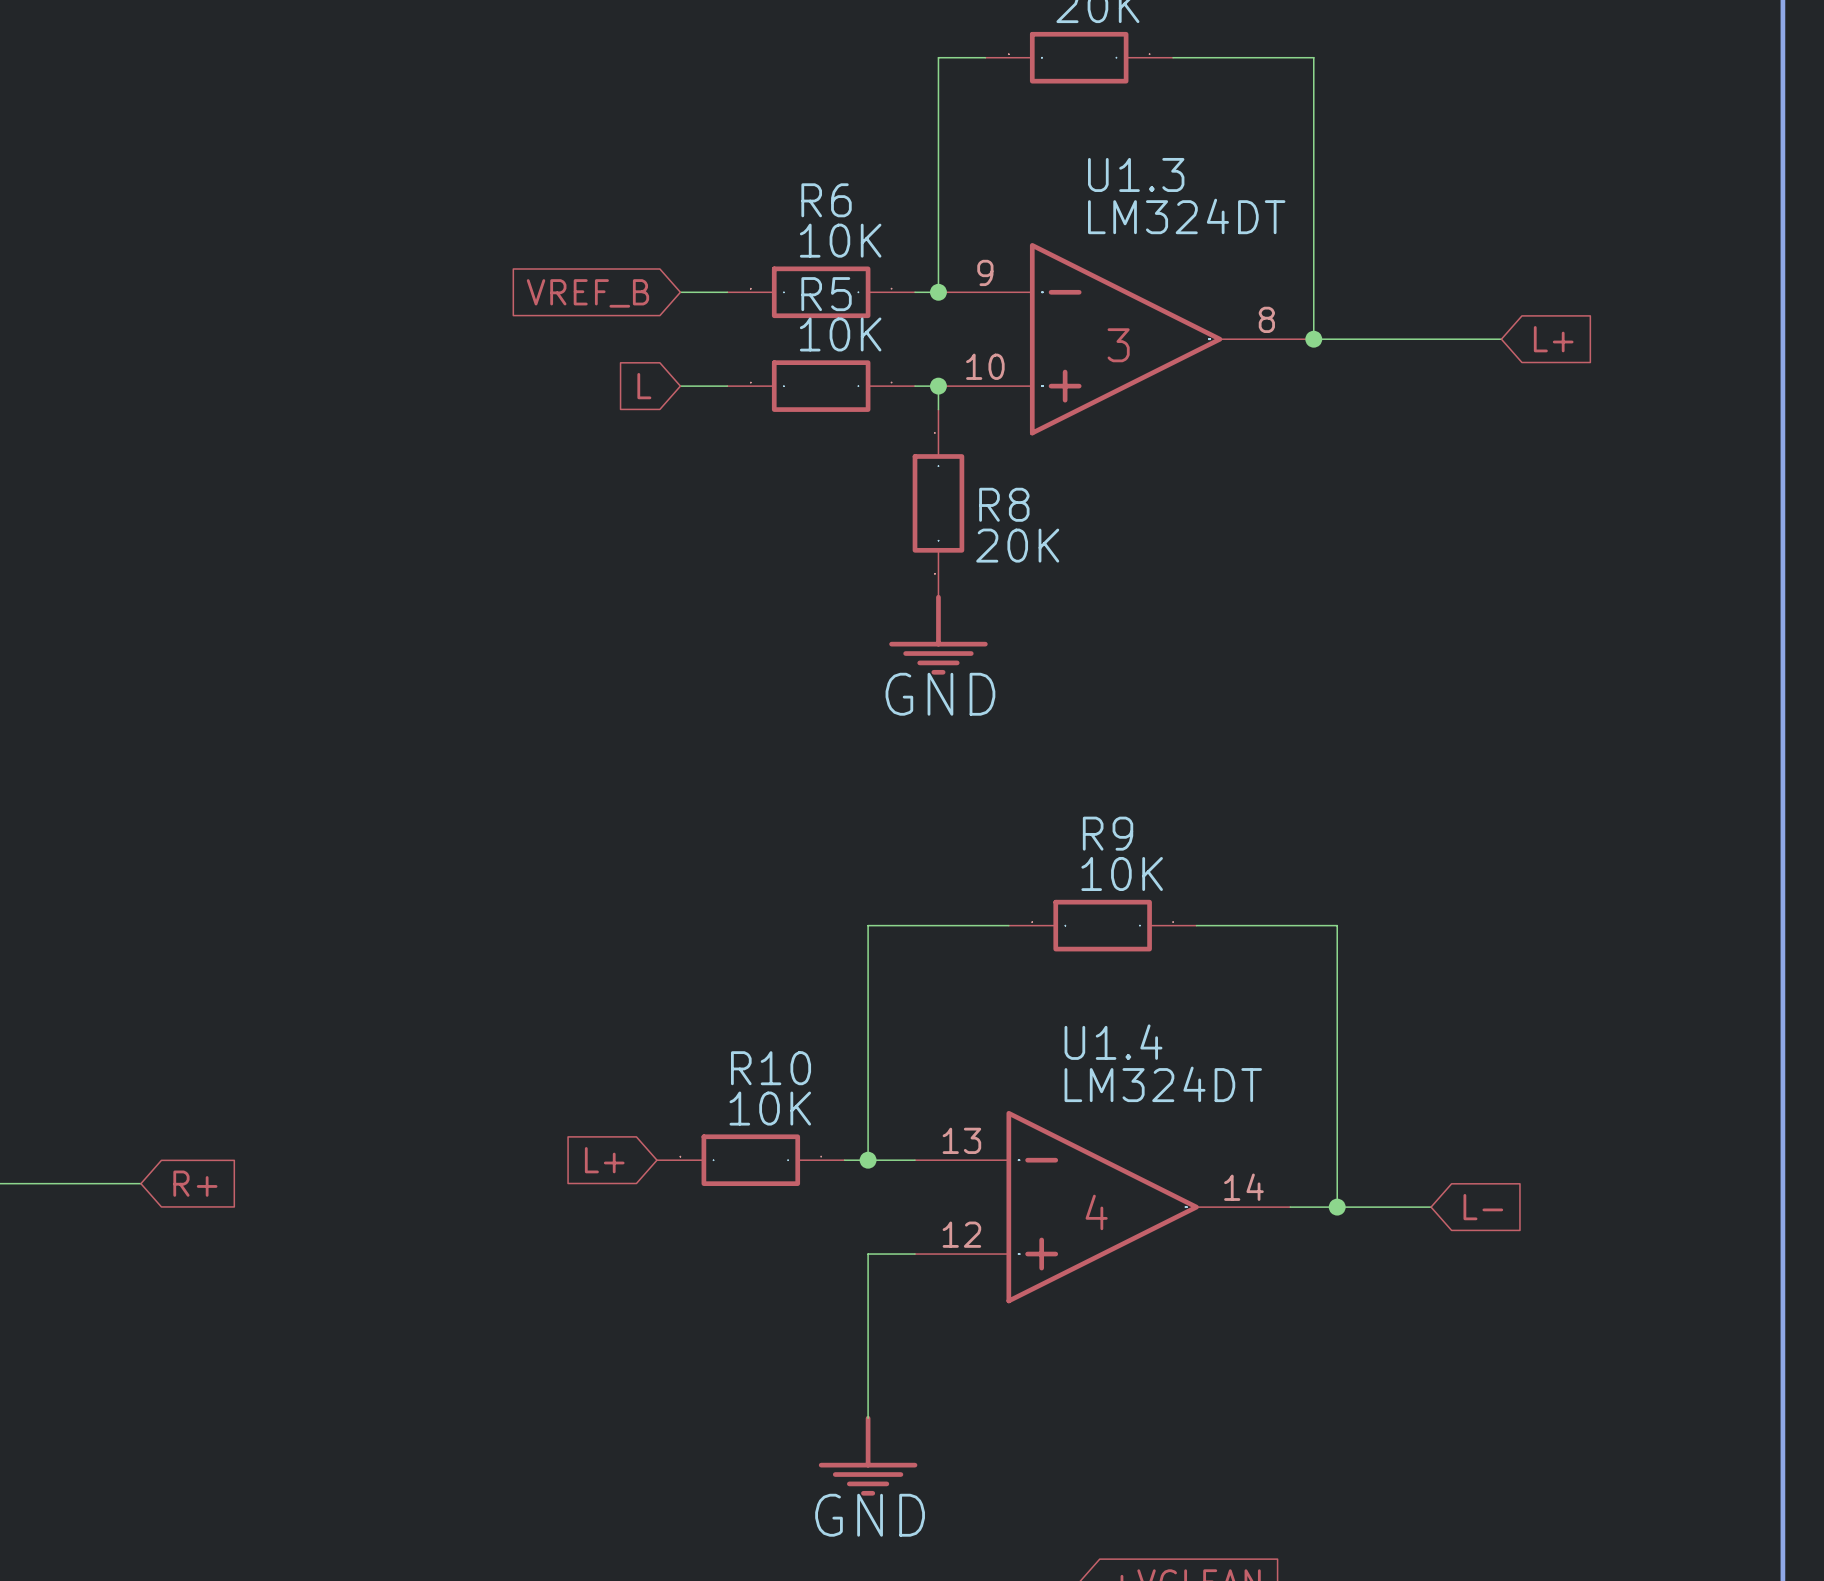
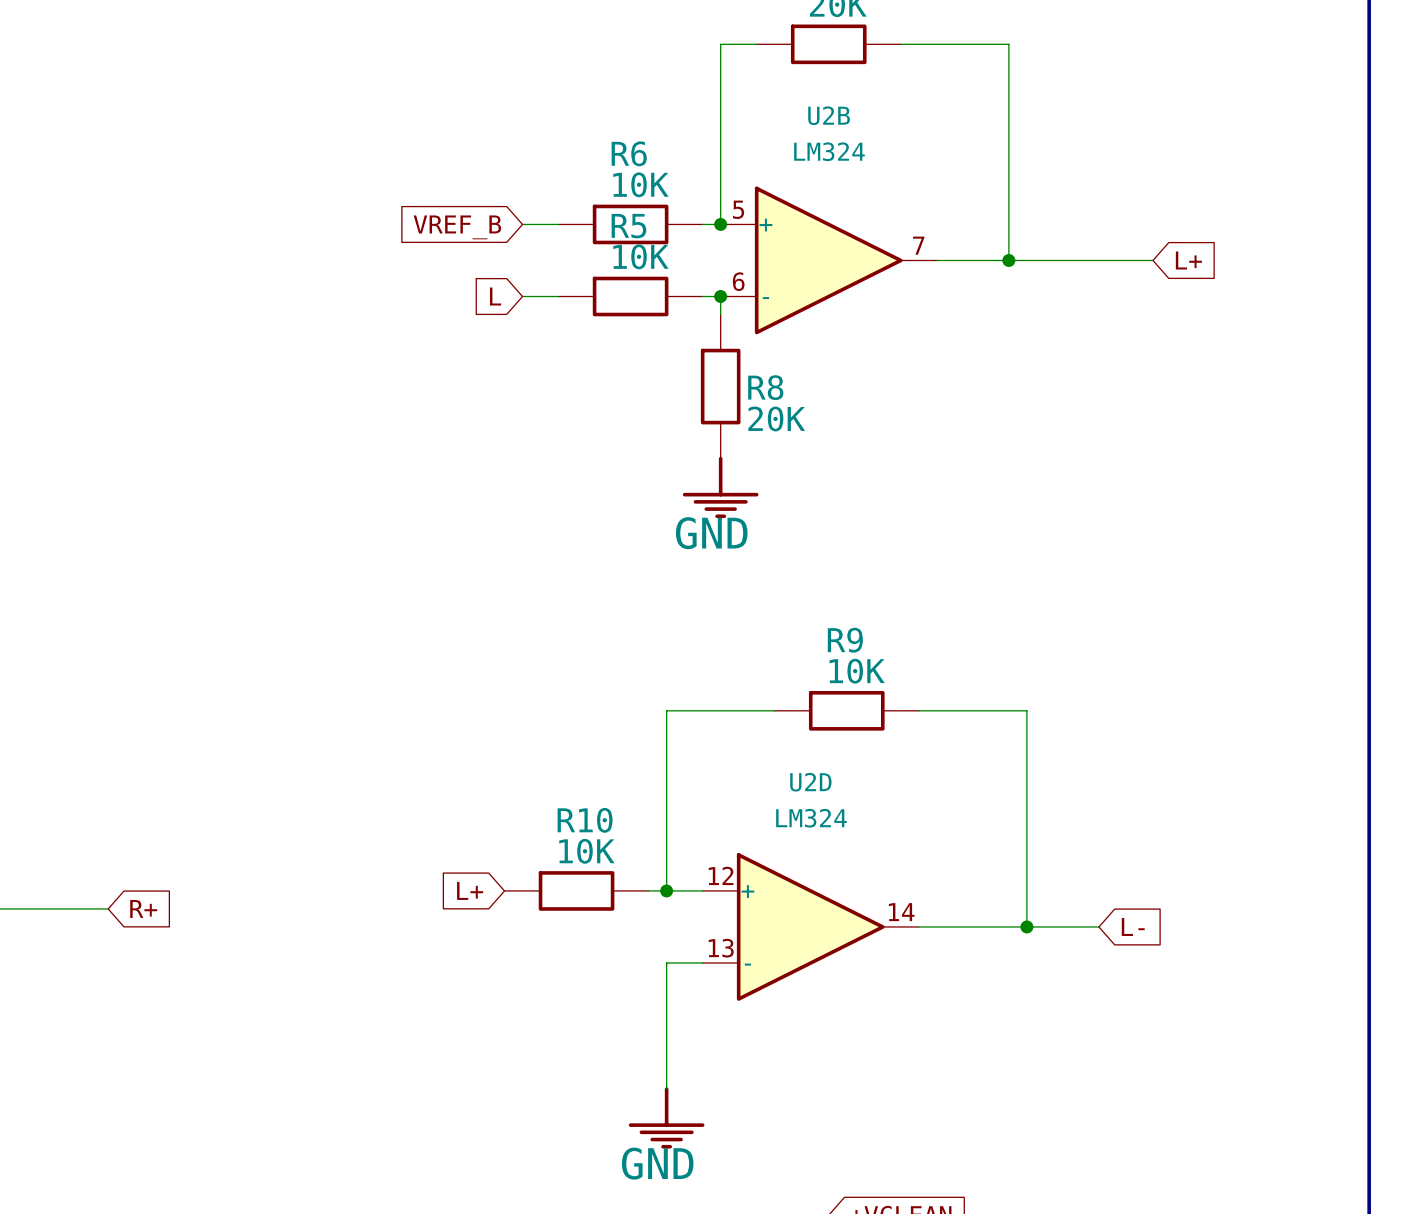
U2B: none -> LM324 (828, 260)
U1.3: LM324DT (1126, 339) -> none
U2D: none -> LM324 (810, 926)
U1.4: LM324DT (1102, 1207) -> none

